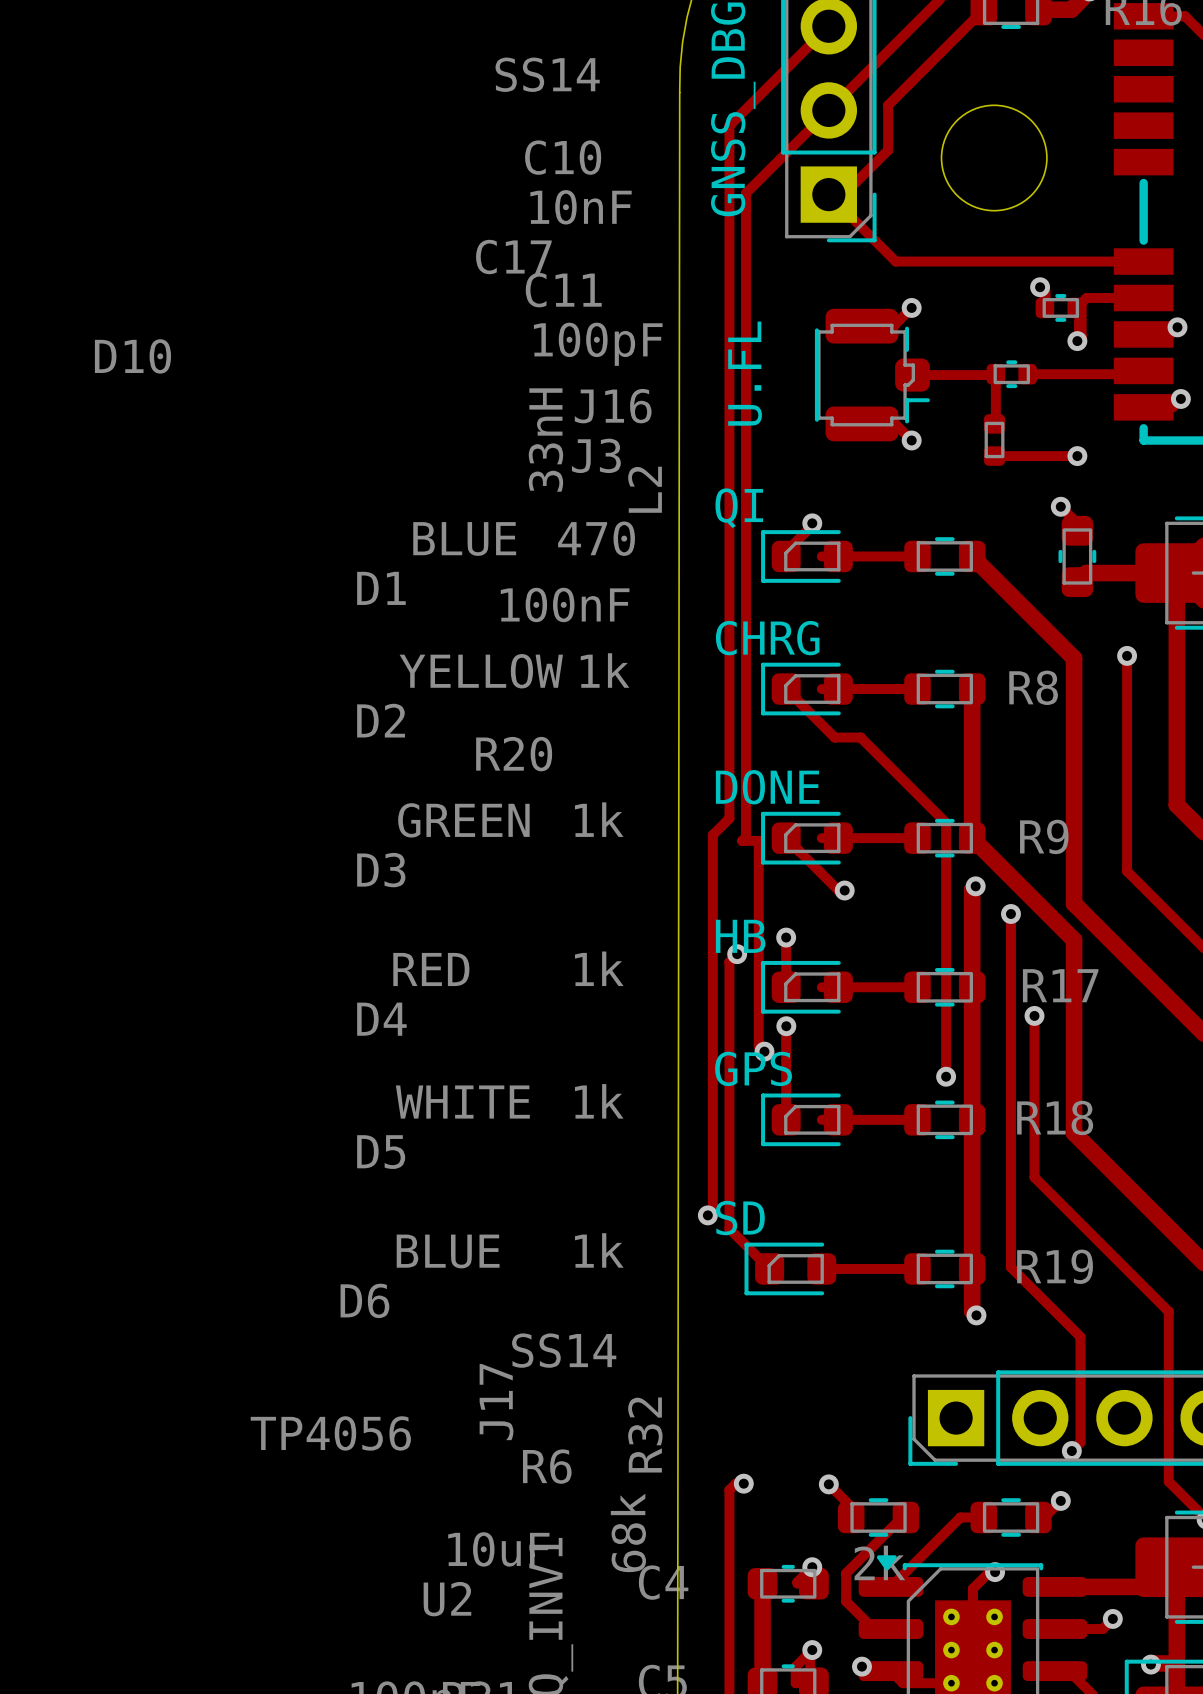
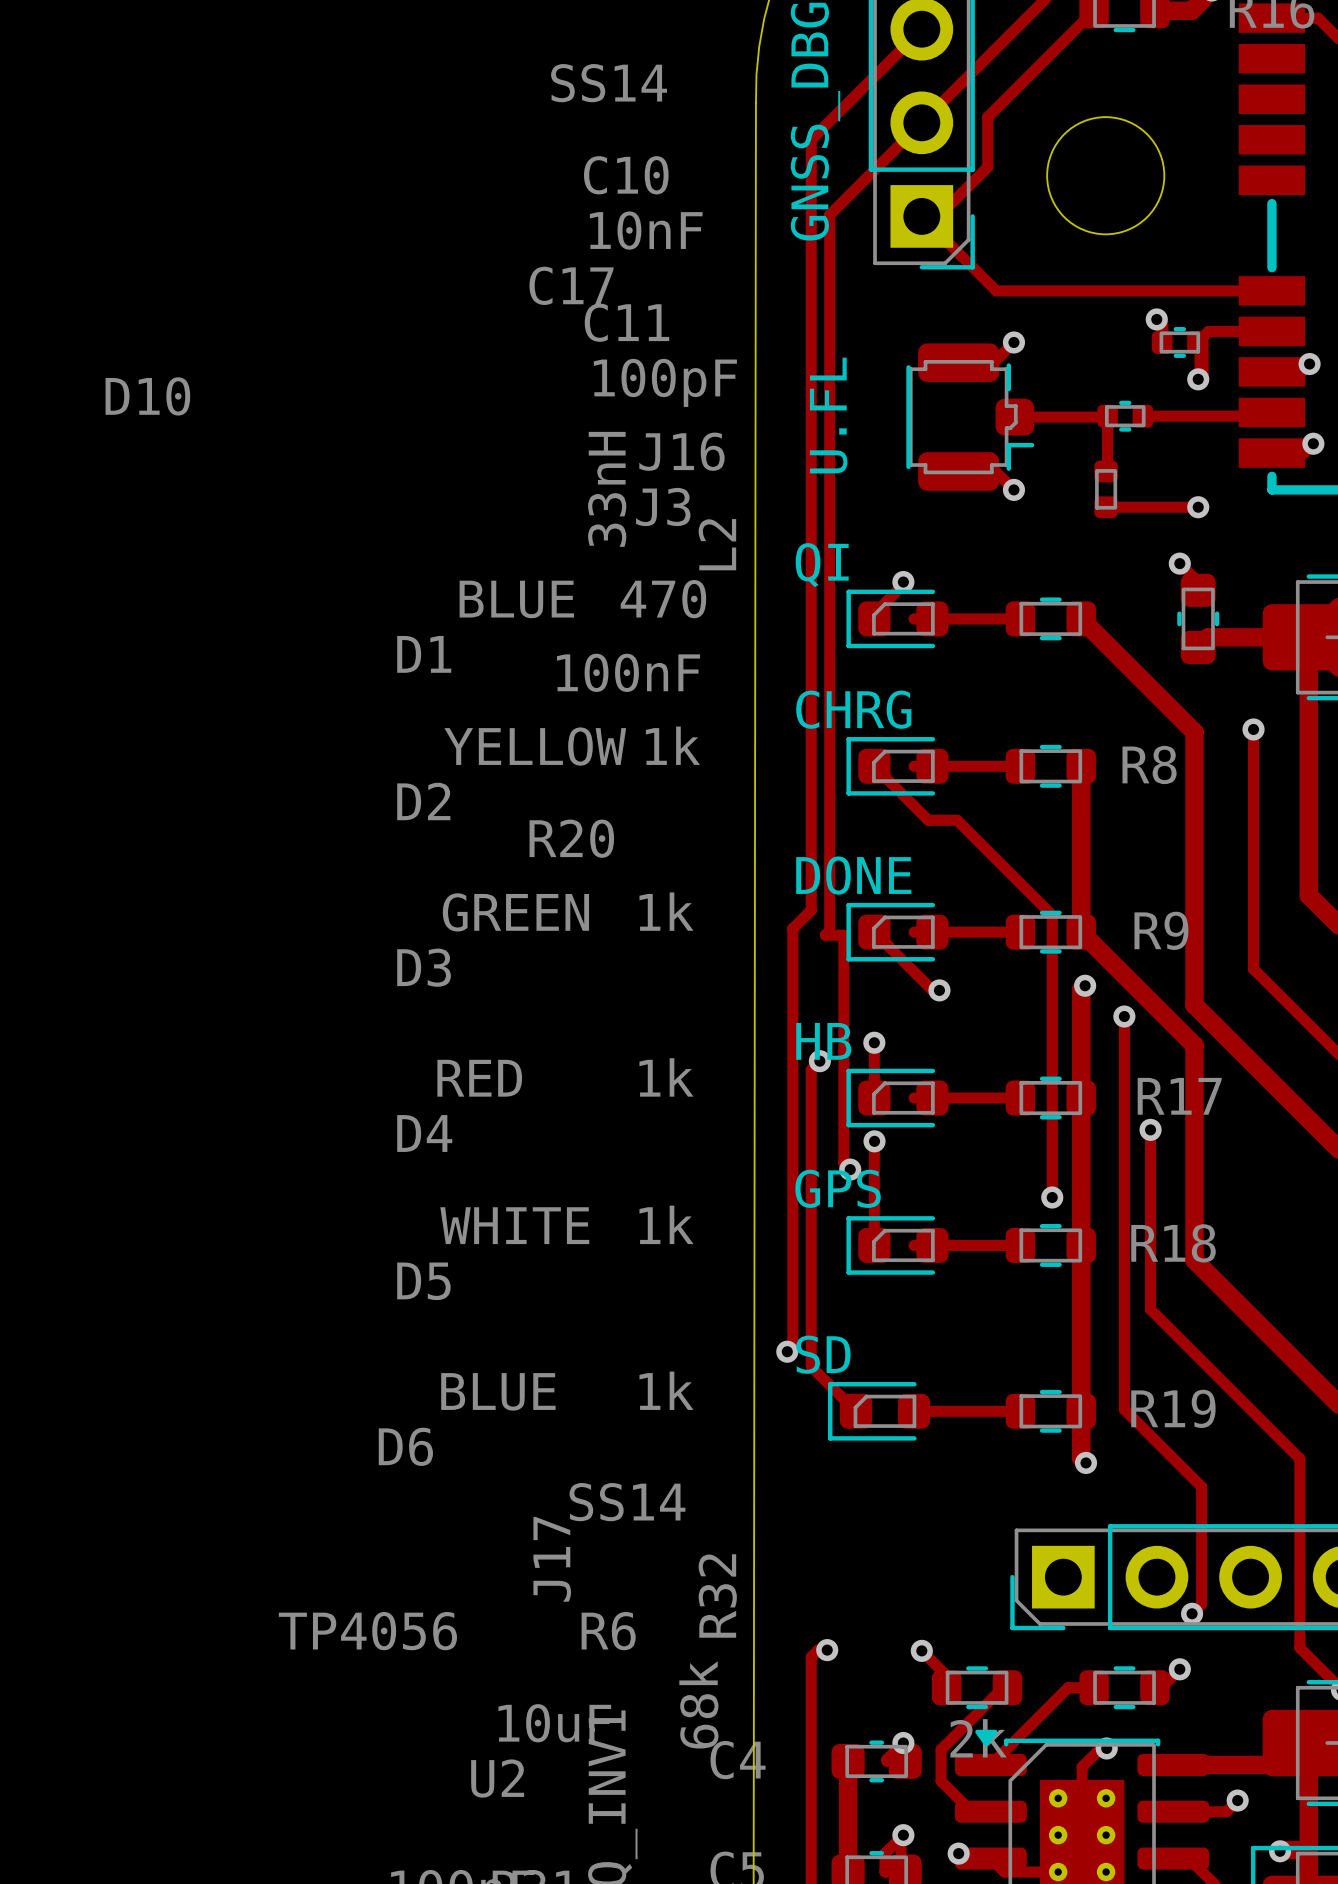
U2 value position: TP4056 (330, 1433) -> TP4056 (367, 1631)

